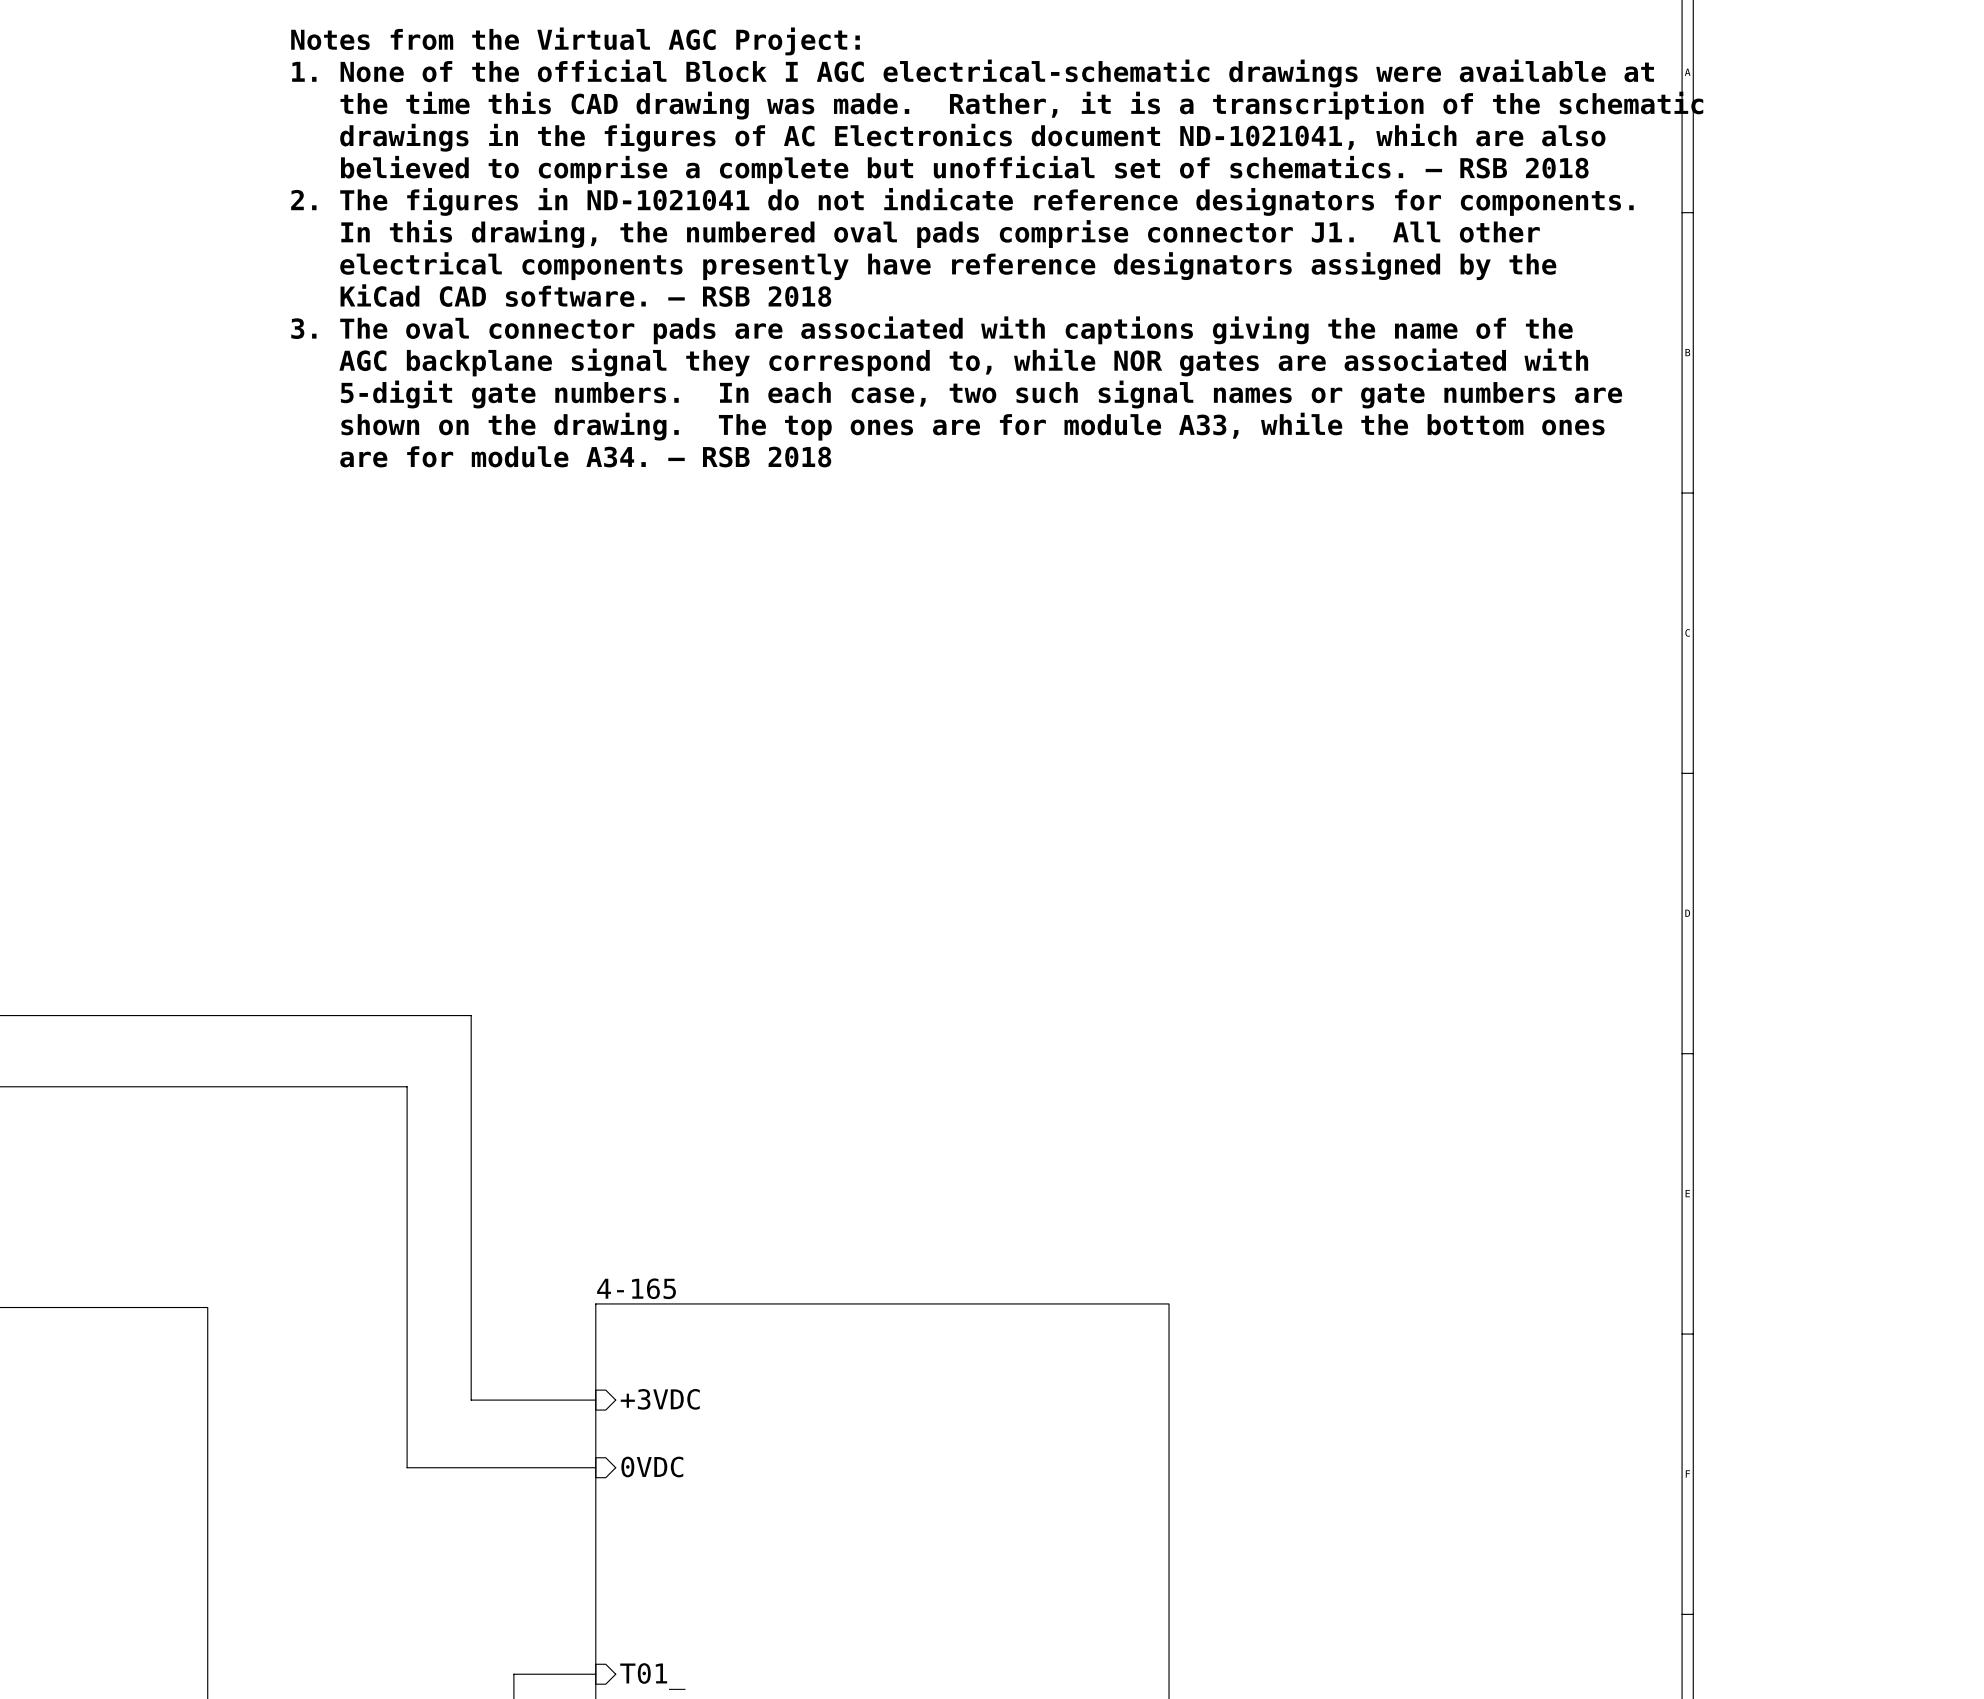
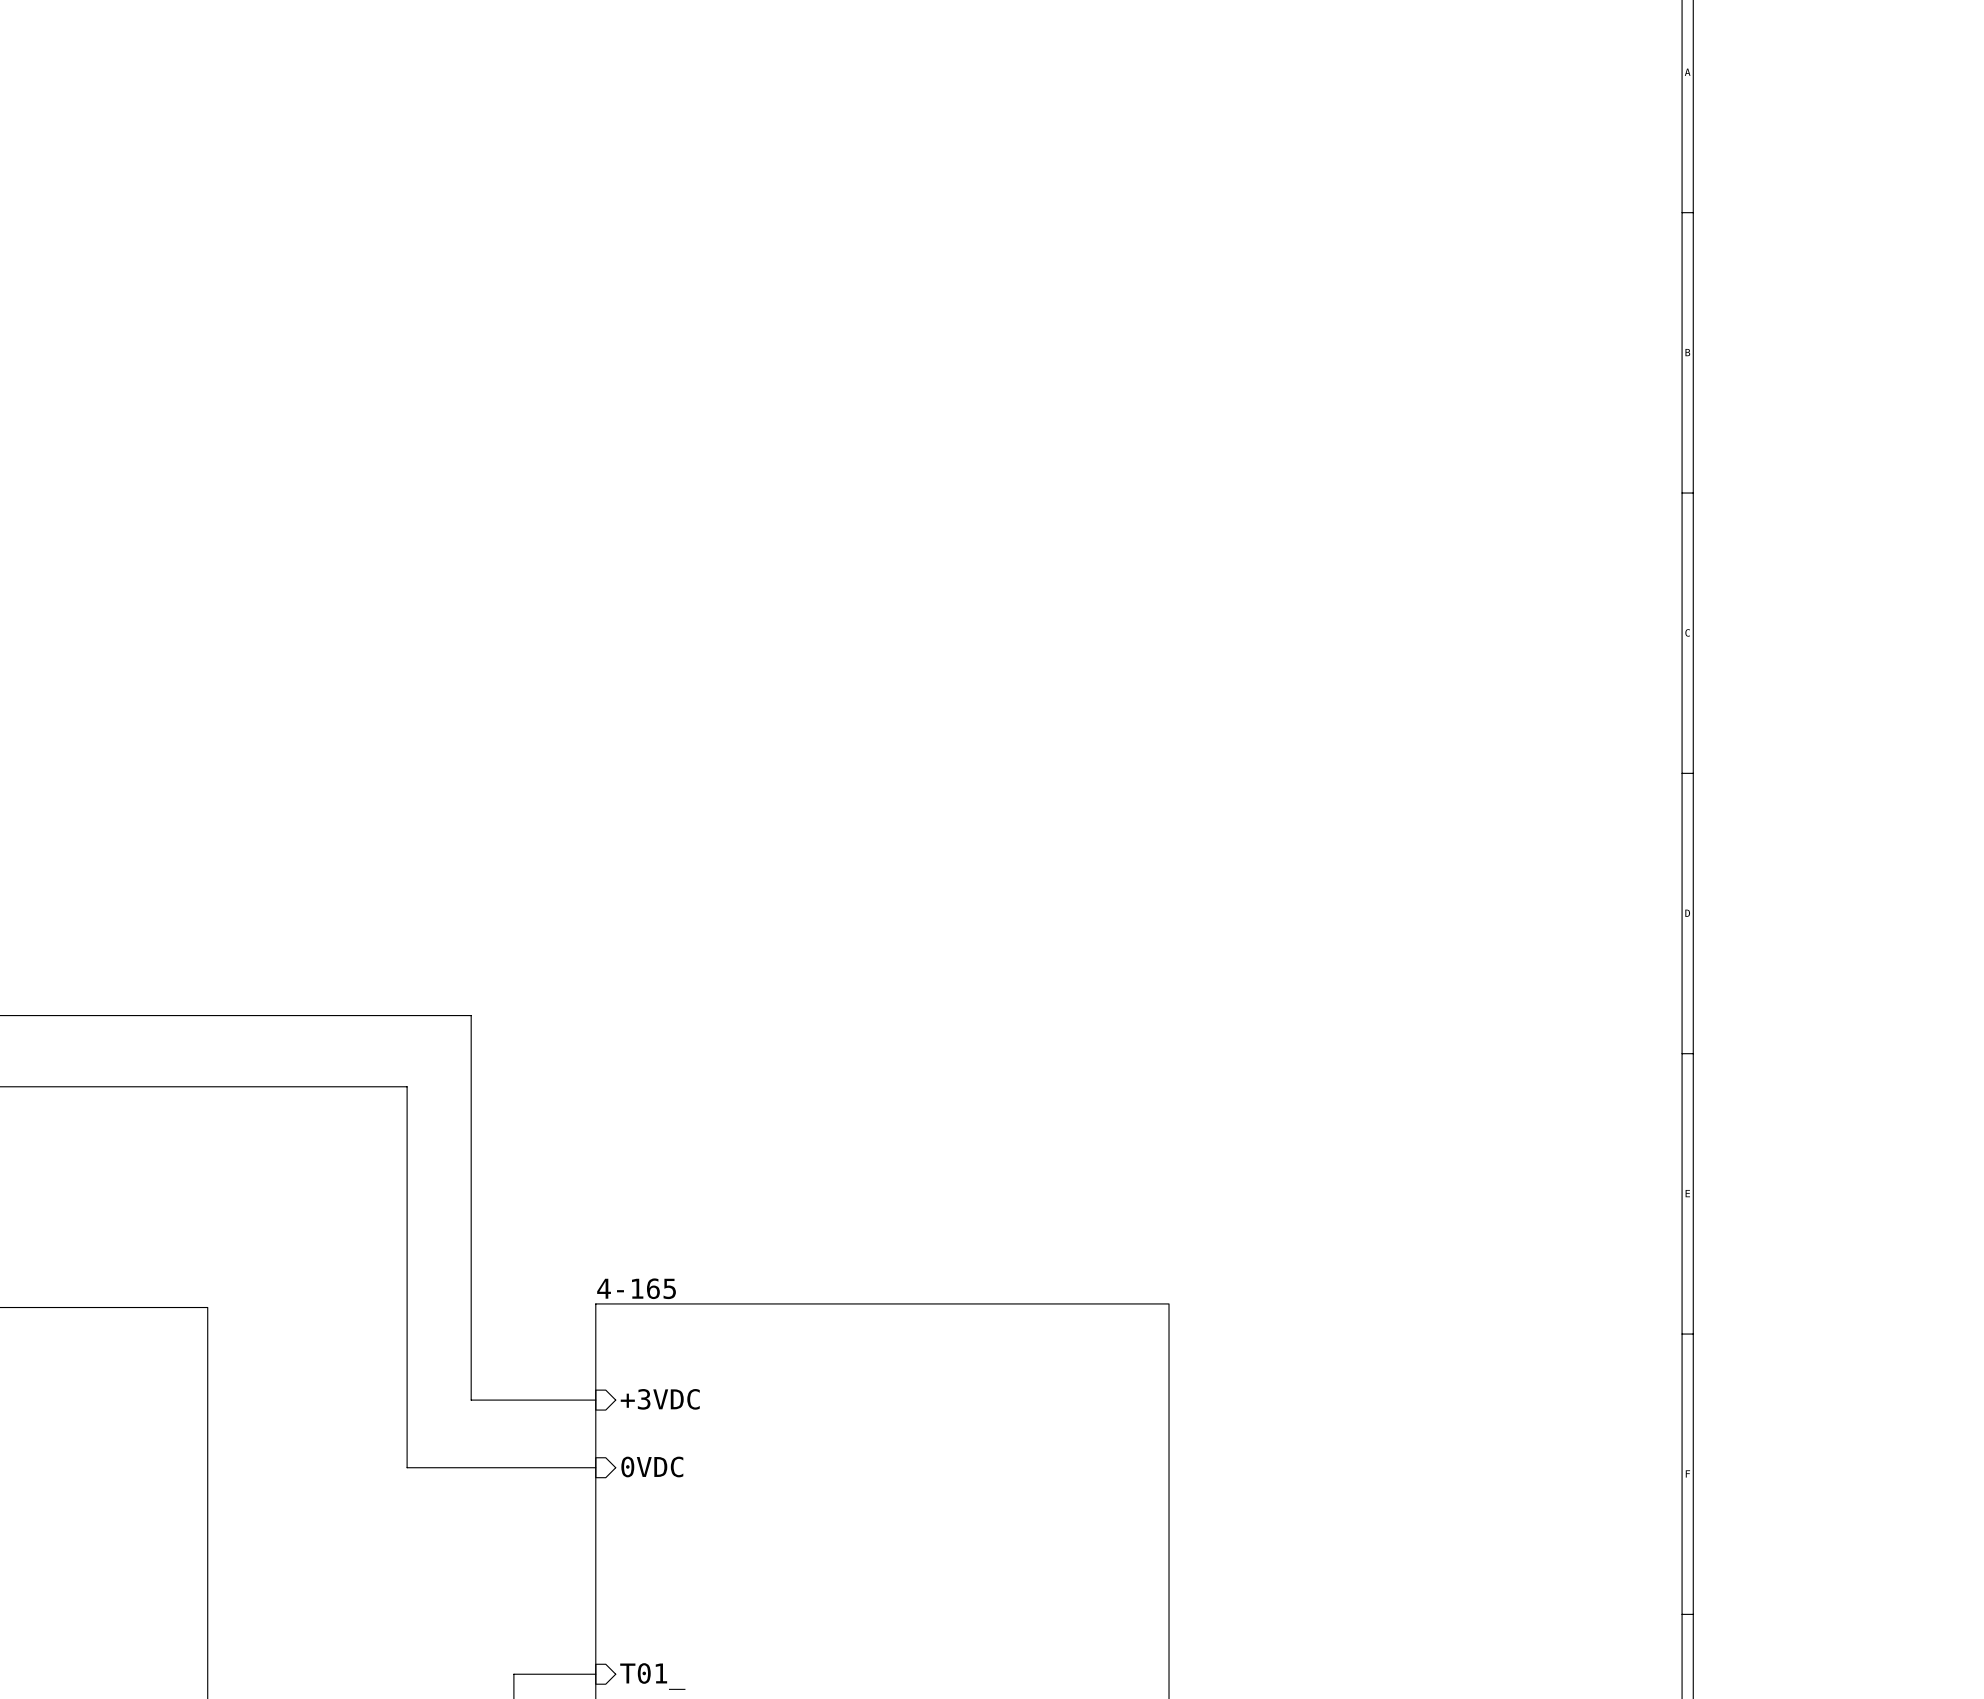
text: Notes from the Virtual AGC Project: (575, 41) -> none
text: 1. None of the official Block I AGC electrical-schematic drawings were available at (973, 73) -> none
text: the time this CAD drawing was made. Rather, it is a transcription of the schematic (1021, 105) -> none
text: drawings in the figures of AC Electronics document ND-1021041, which are also (972, 137) -> none
text: believed to comprise a complete but unofficial set of schematics. — RSB 2018 (964, 169) -> none
text: 2. The figures in ND-1021041 do not indicate reference designators for components. (962, 201) -> none
text: In this drawing, the numbered oval pads comprise connector J1. All other (940, 234) -> none
text: electrical components presently have reference designators assigned by the (948, 266) -> none
text: KiCad CAD software. — RSB 2018 (585, 295) -> none
text: 3. The oval connector pads are associated with captions giving the name of the (931, 330) -> none
text: AGC backplane signal they correspond to, while NOR gates are associated with (963, 362) -> none
text: 5-digit gate numbers. In each case, two such signal names or gate numbers are (981, 394) -> none
text: shown on the drawing. The top ones are for module A33, while the bottom ones (972, 426) -> none
text: are for module A34. — RSB 2018 (585, 456) -> none

